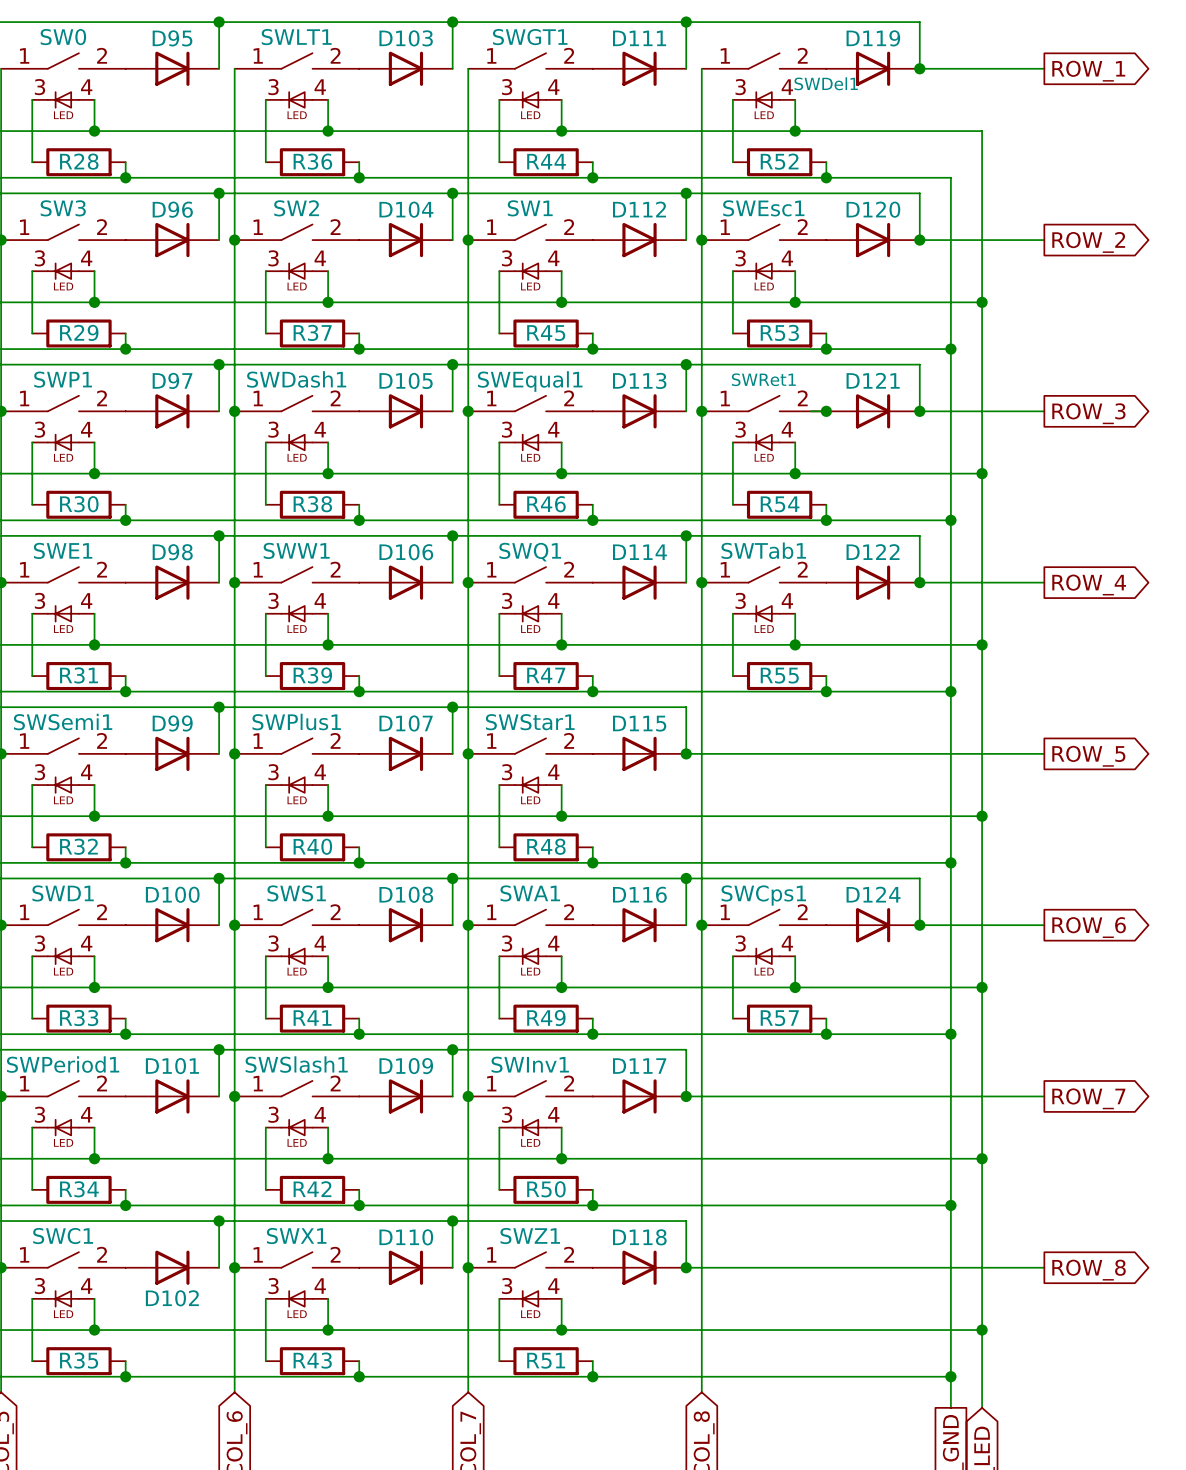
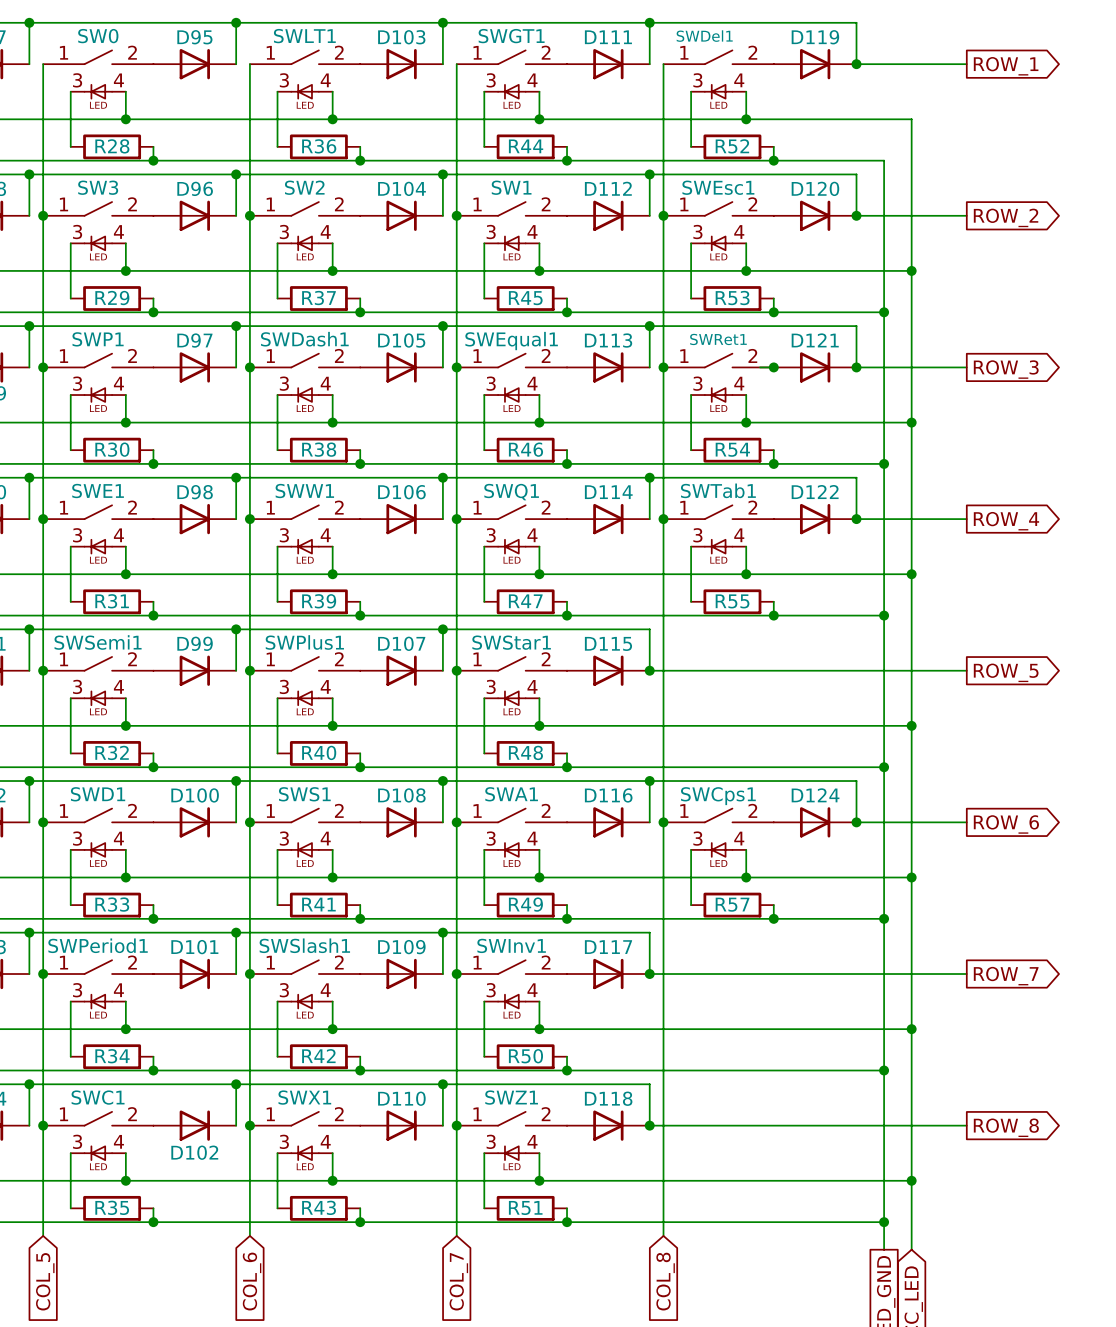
SWDel1 name position: SWDel1 (826, 83) -> SWDel1 (704, 36)

